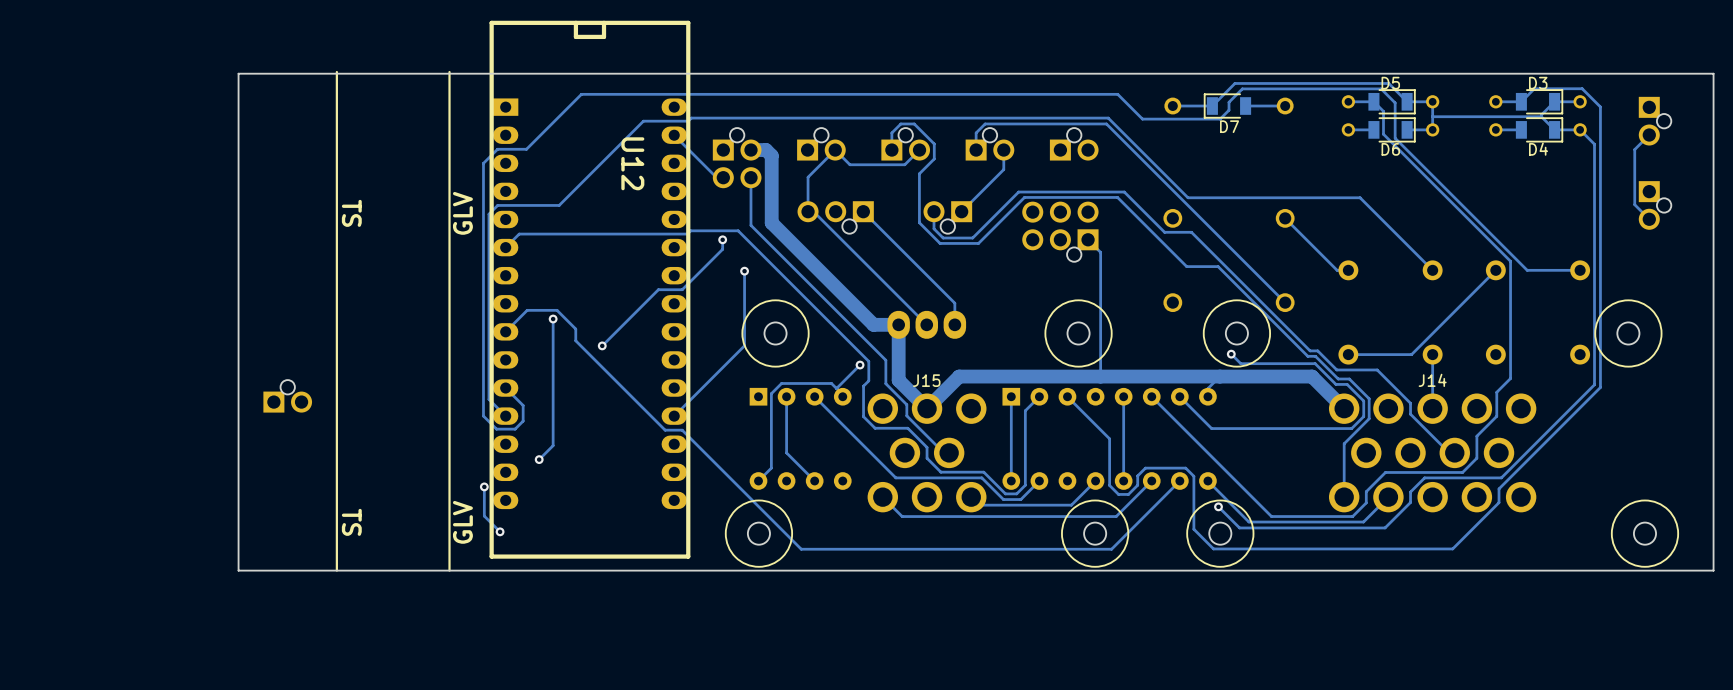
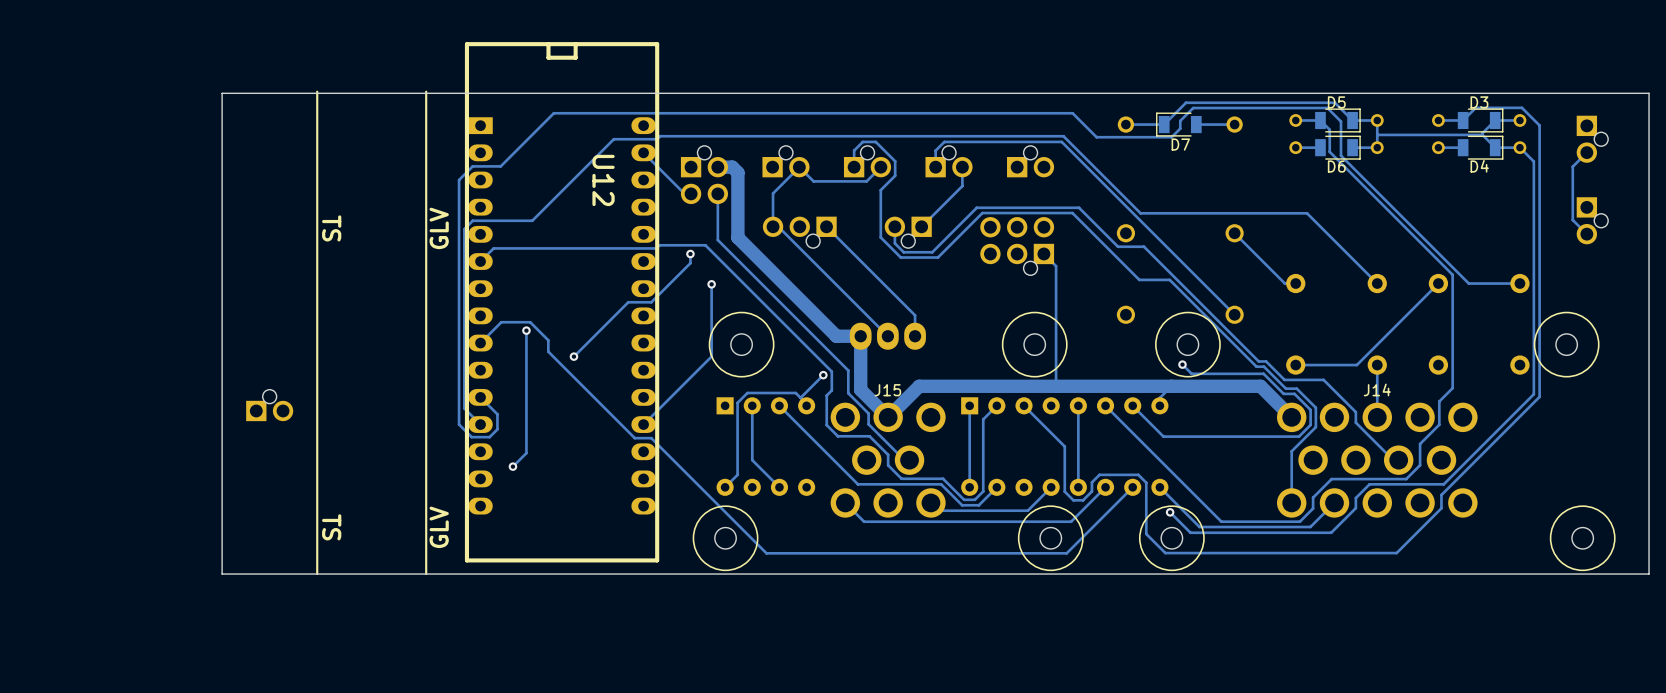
track: (484, 486) (484, 516) (500, 531) -> none
via: (484, 486) -> none
via: (500, 531) -> none

